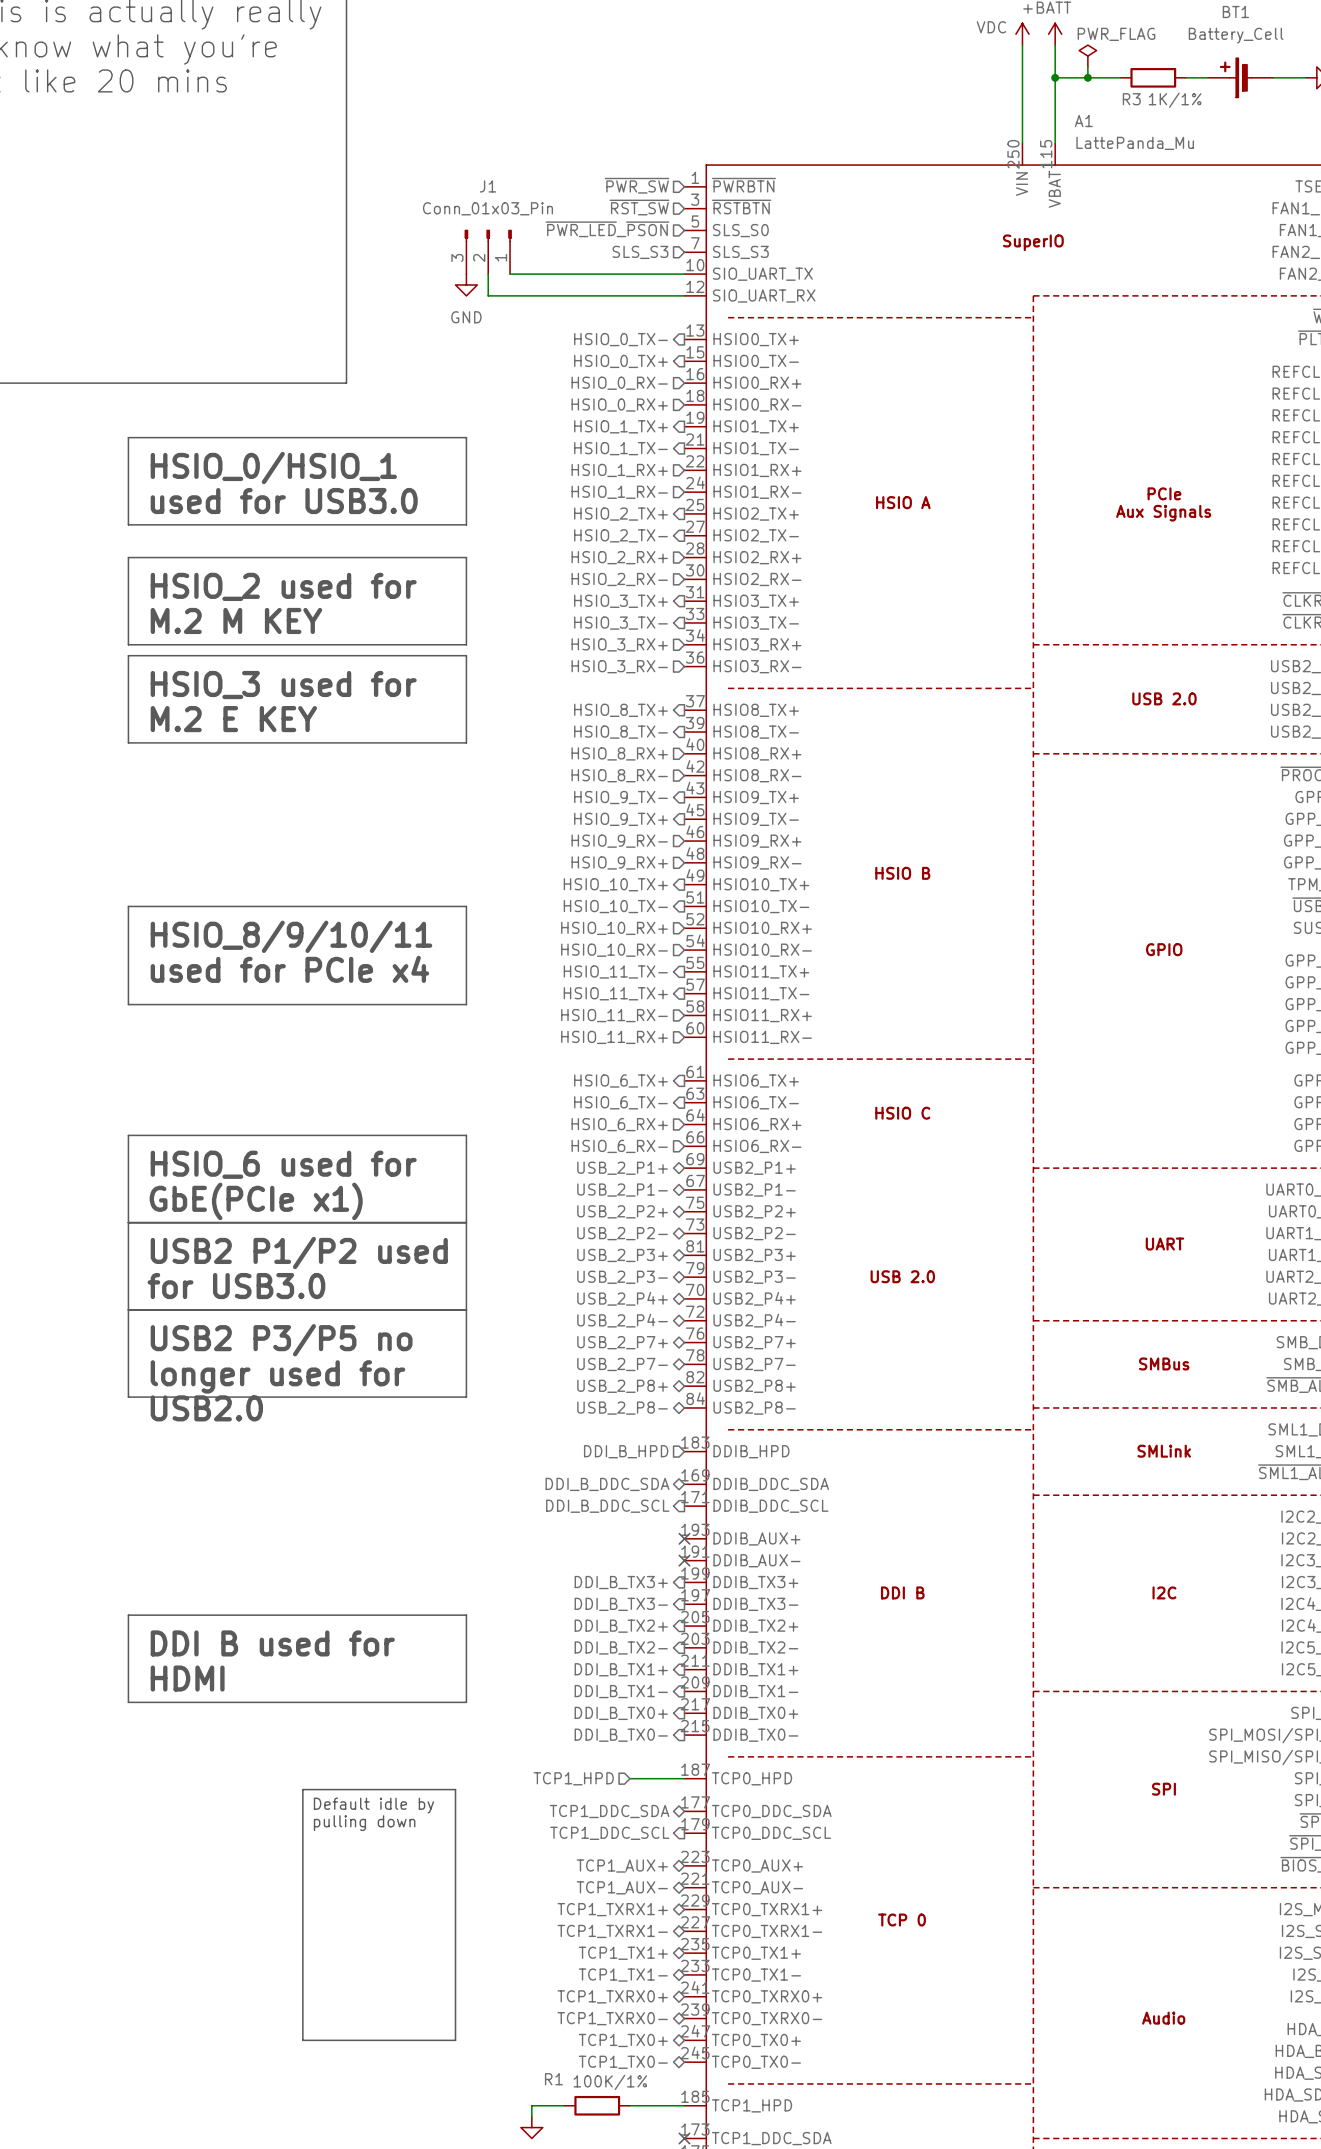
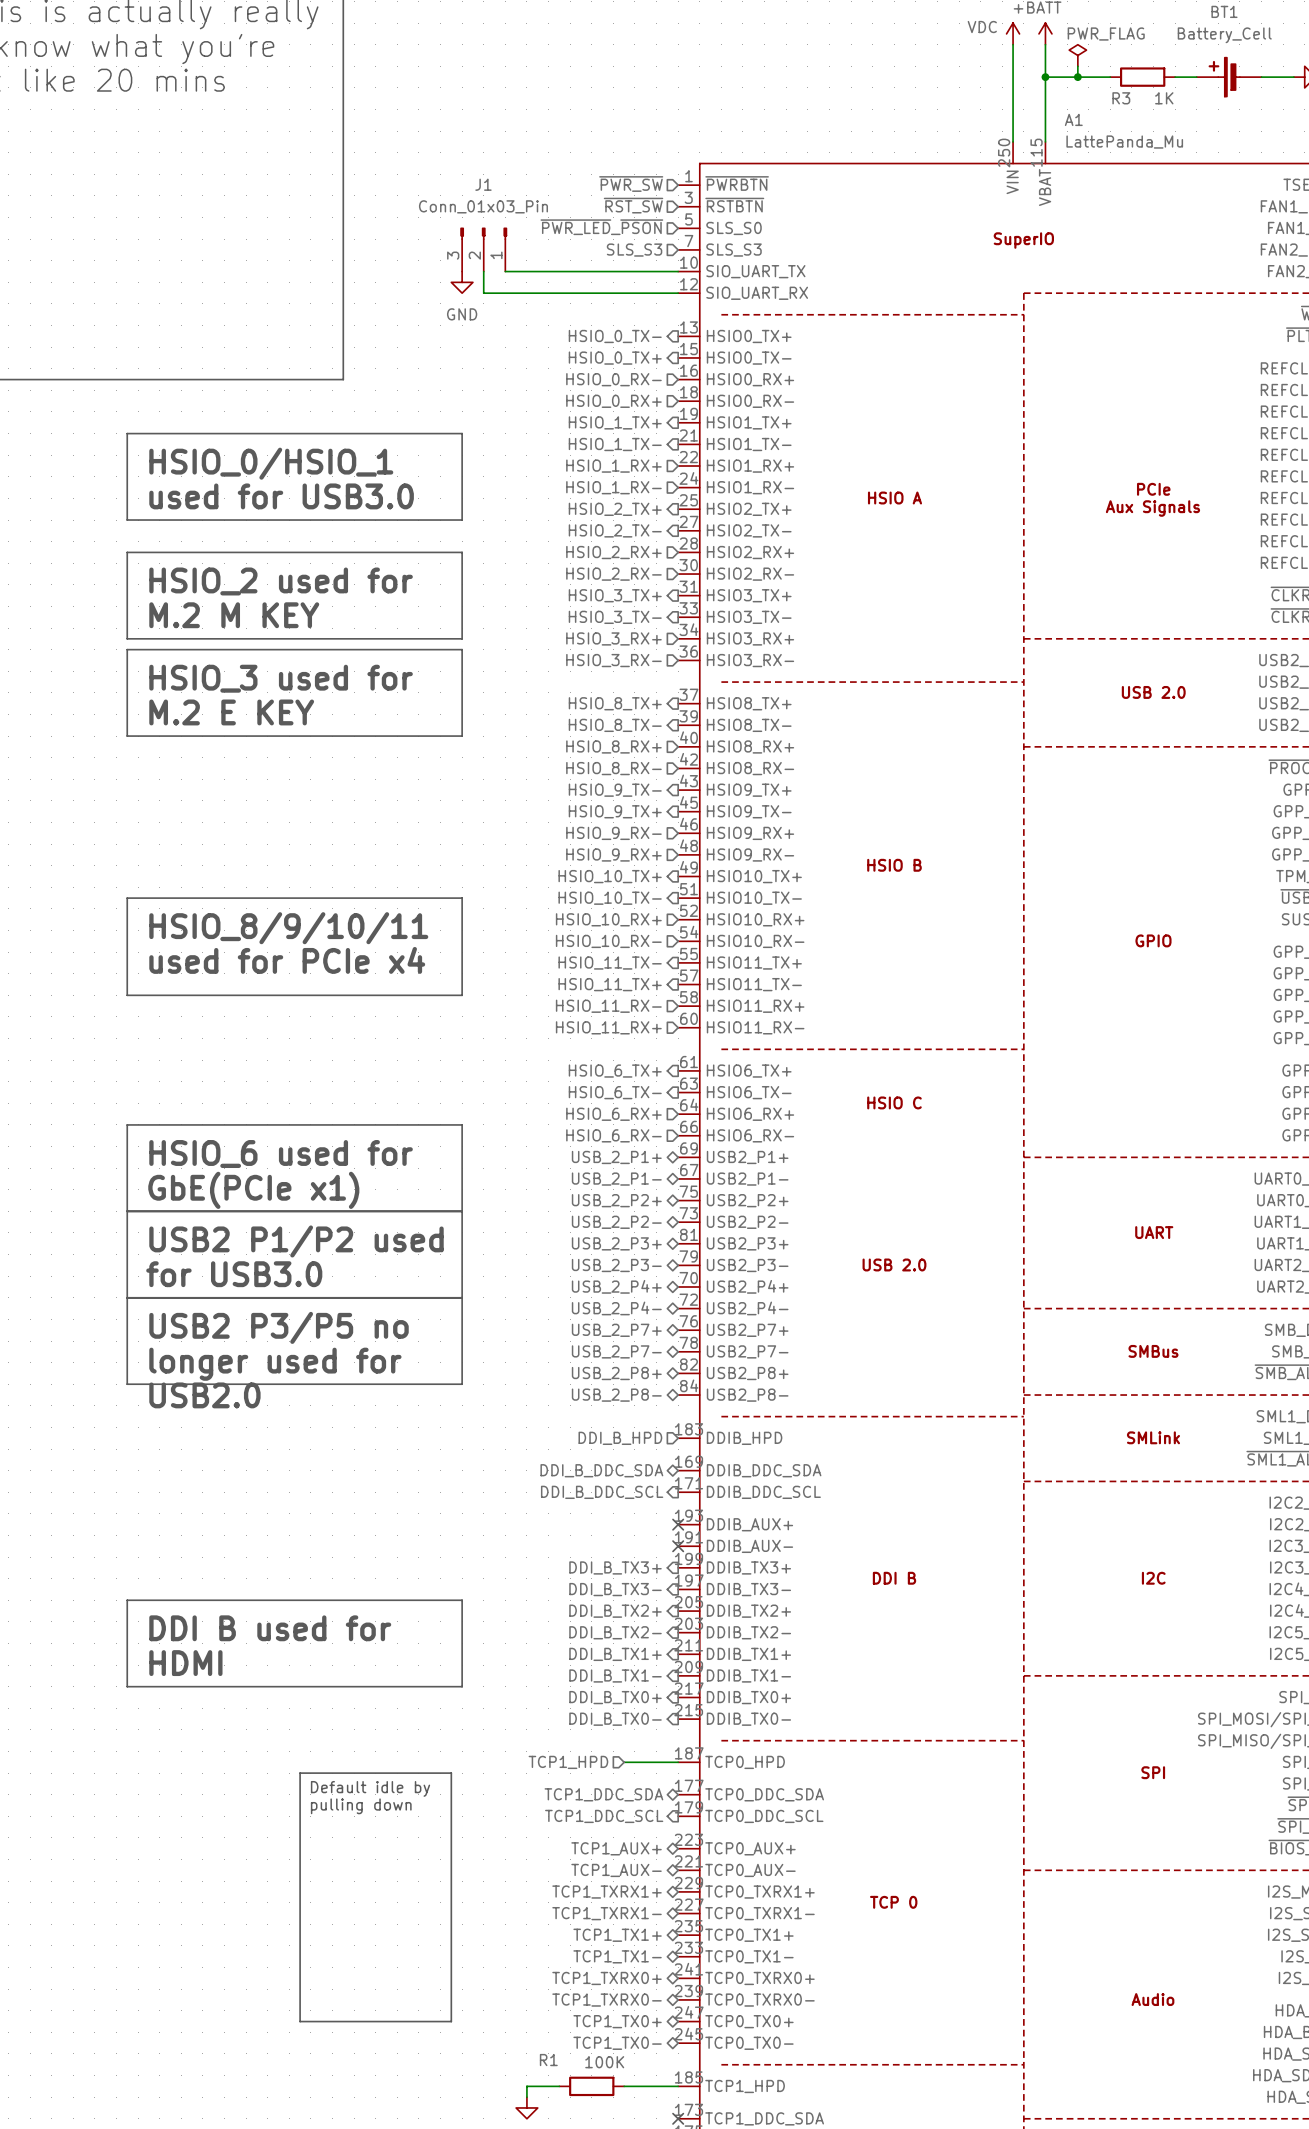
R3 value: 1K/1% (1175, 100) -> 1K (1164, 98)
R1 value: 100K/1% (610, 2082) -> 100K (604, 2062)

